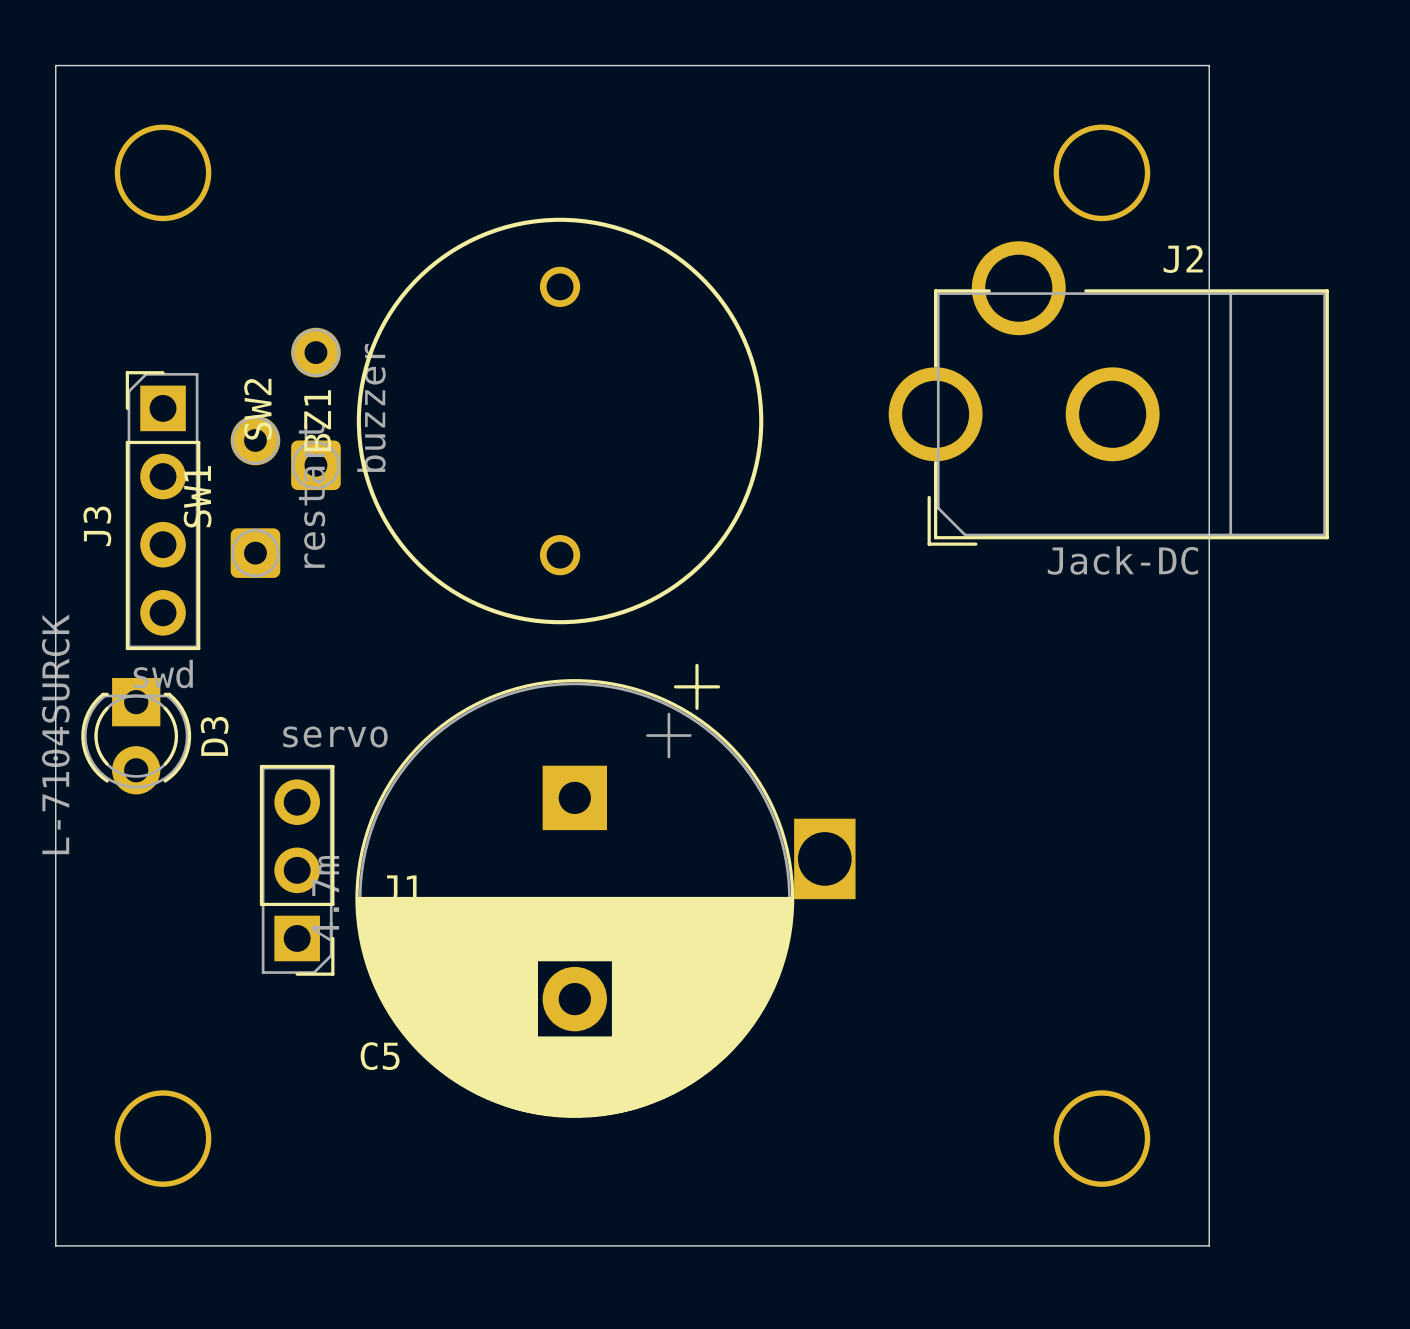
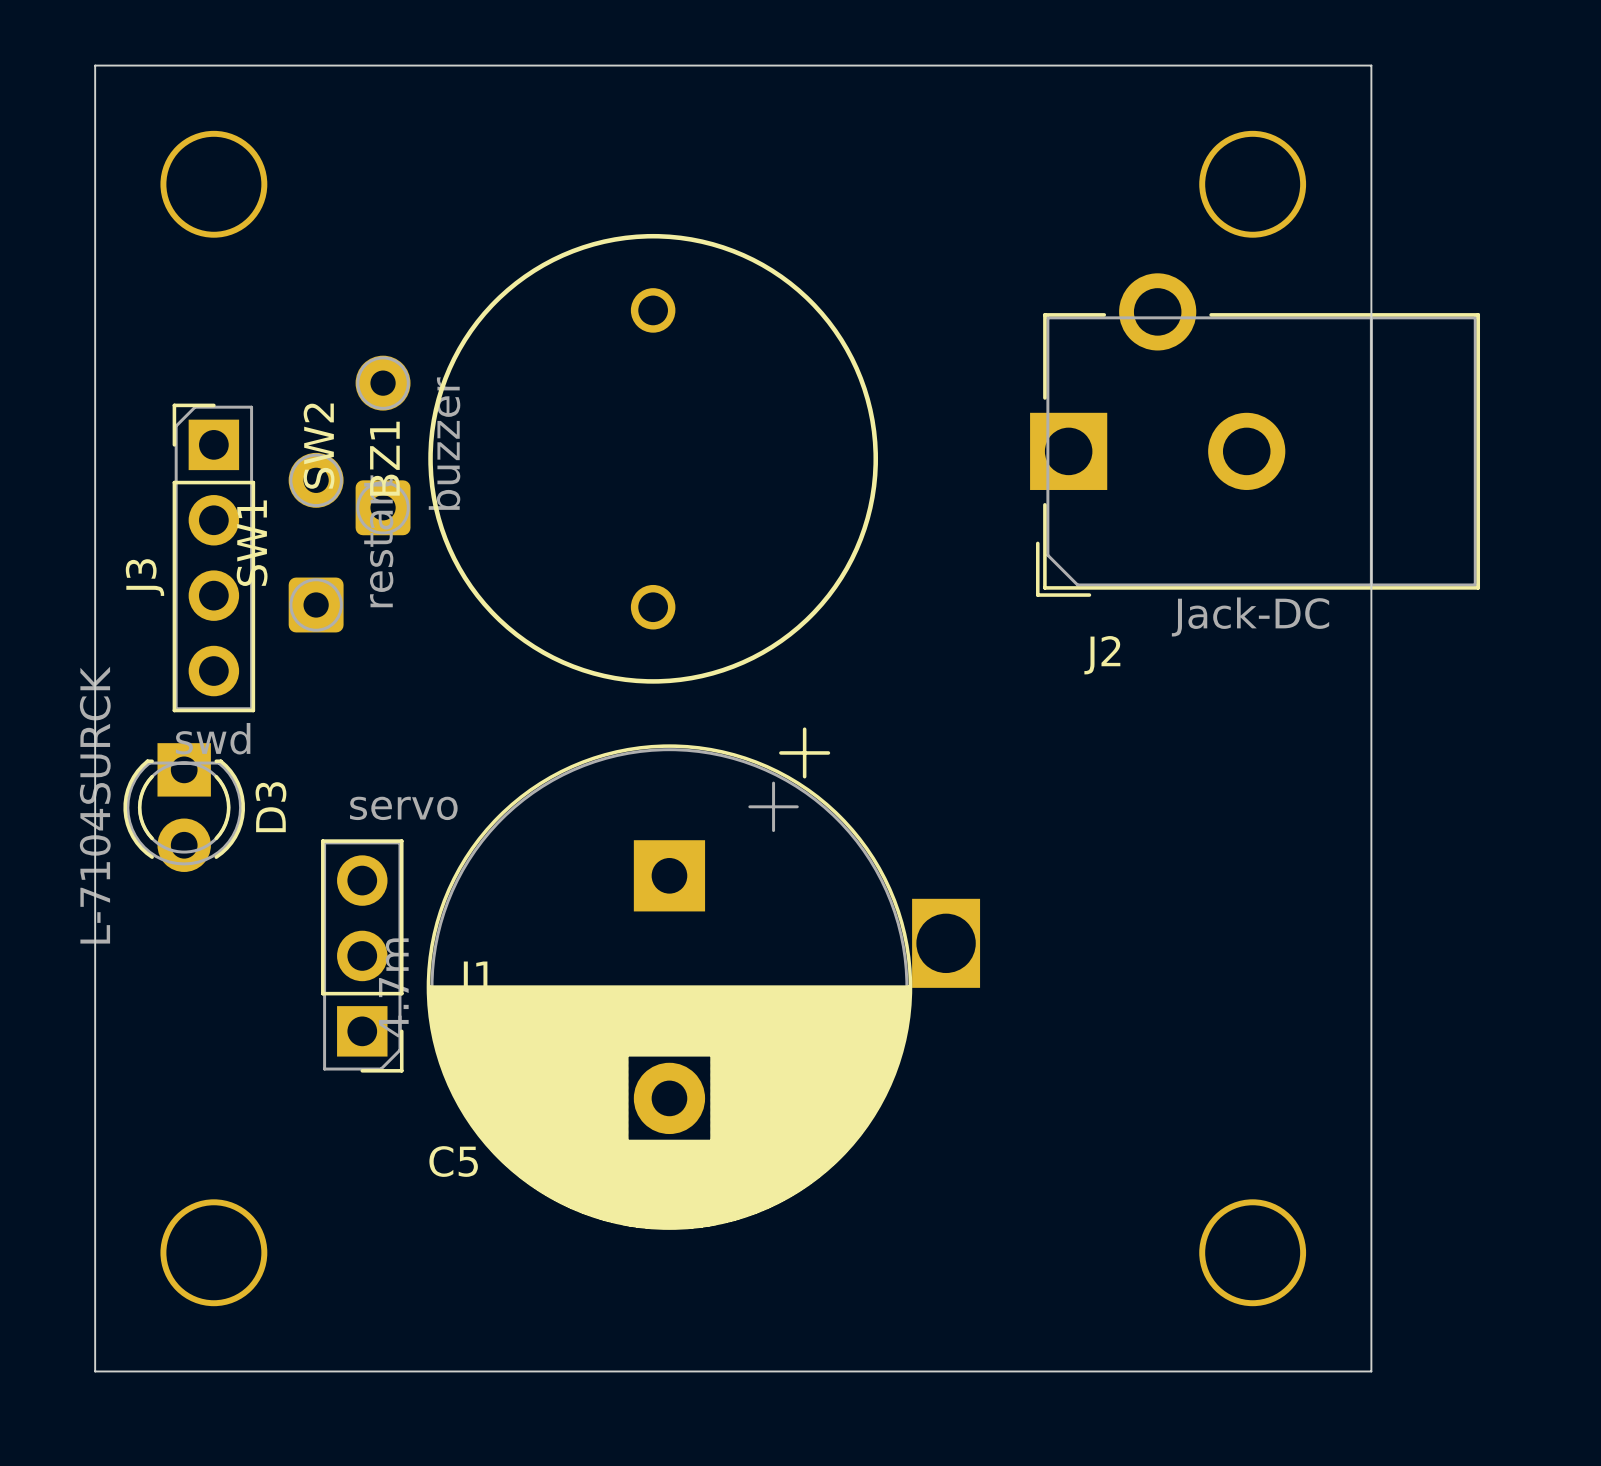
J2 footprint: [888, 241, 1329, 546] -> [1030, 273, 1481, 597]
J2 name position: J2 (1183, 259) -> J2 (1102, 655)

